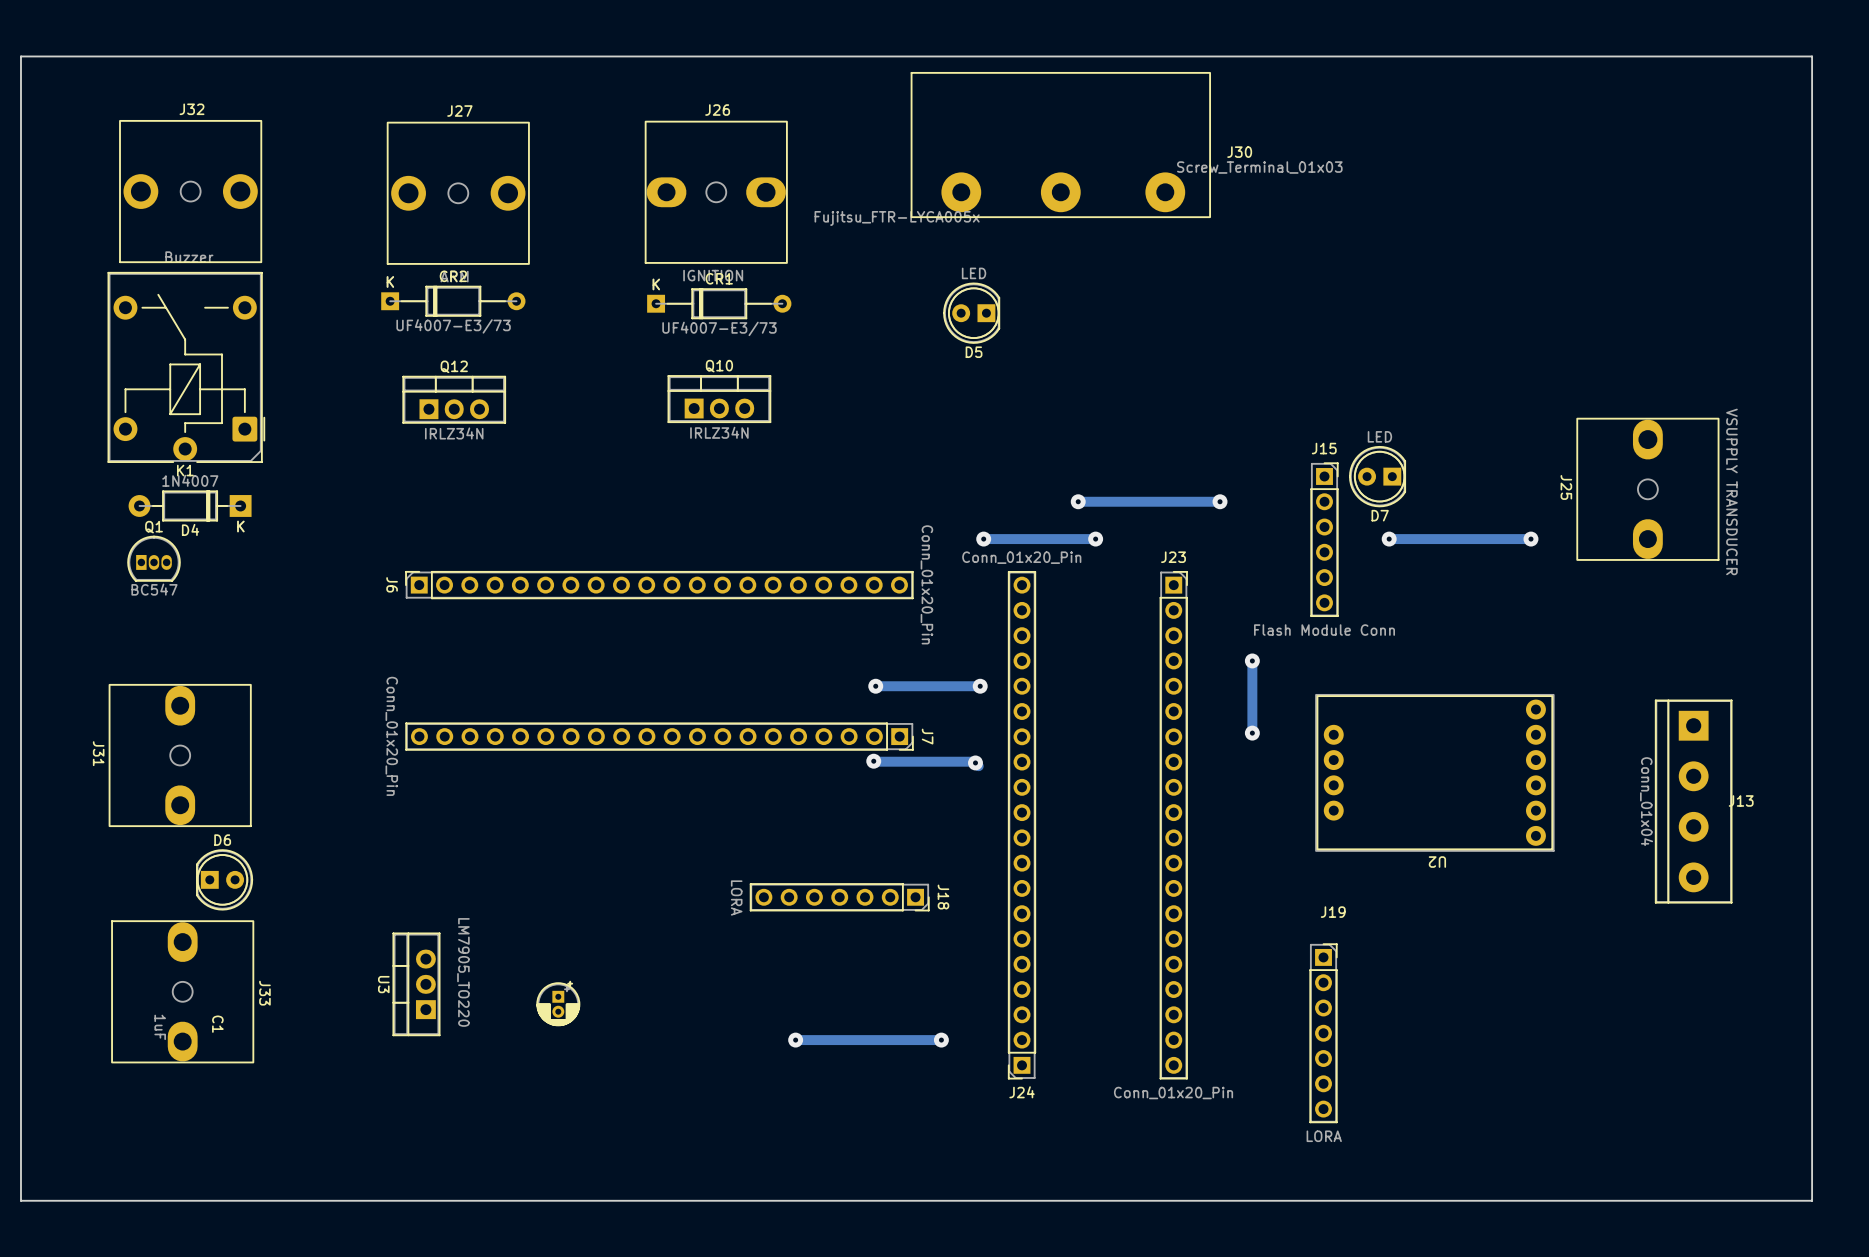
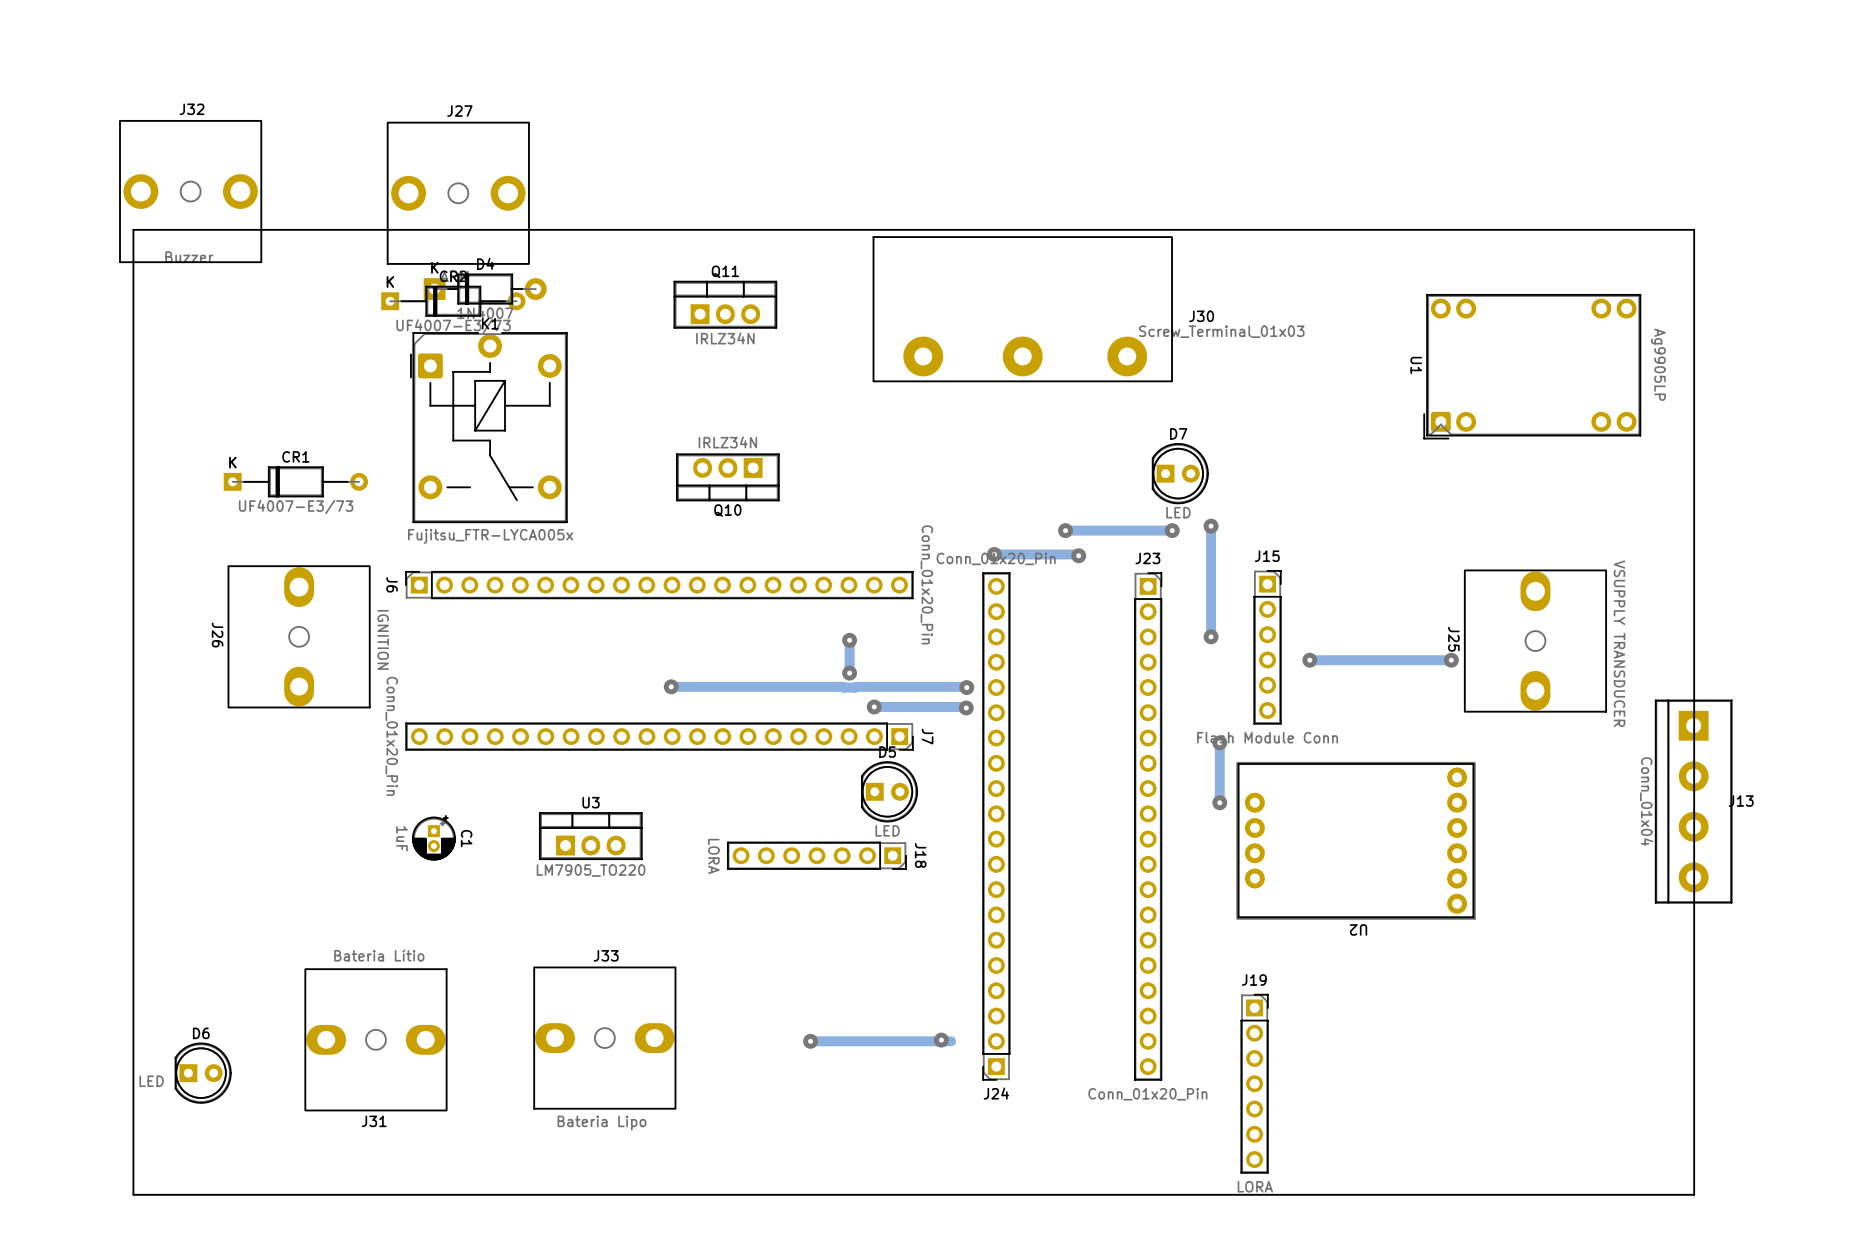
board edge: (1812, 56) (20, 56) (20, 1200) (1812, 1200) (1812, 56) -> (1694, 229) (1694, 1194) (133, 1194) (133, 229) (1694, 229)
J30 position: (1060, 145) -> (1022, 309)
J26 rotation: 0° (716, 192) -> 90° counterclockwise (299, 636)
J26 position: (716, 192) -> (299, 636)
K1 value position: Fujitsu_FTR-LYCA005x (897, 218) -> Fujitsu_FTR-LYCA005x (490, 536)
CR1 position: (719, 303) -> (295, 481)
Q11: none -> IRLZ34N (725, 304)
D5 rotation: 0° (971, 313) -> 180° (889, 791)
D5 position: (971, 313) -> (889, 791)
U1: none -> Ag9905LP (1532, 366)
K1 rotation: 0° (186, 367) -> 180° (488, 427)
K1 position: (186, 367) -> (488, 427)
Q12: IRLZ34N (454, 399) -> none
Q10 rotation: 0° (719, 399) -> 180° (727, 477)
Q10 position: (719, 399) -> (727, 477)
D7 rotation: 0° (1377, 476) -> 180° (1180, 473)
D7 position: (1377, 476) -> (1180, 473)
J25 position: (1647, 489) -> (1535, 641)
via: (1078, 501) -> none
track: (1220, 501) (1078, 501) -> none
via position: (1220, 501) -> (1211, 526)
D4 rotation: 0° (190, 505) -> 180° (485, 289)
D4 position: (190, 505) -> (485, 289)
track: none -> (1211, 526) (1211, 636)
via: none -> (1065, 530)
track: none -> (1172, 530) (1065, 530)
via: none -> (1172, 530)
via position: (983, 539) -> (994, 554)
track: (1095, 539) (983, 539) -> none
via: (1095, 539) -> none
J15 position: (1324, 539) -> (1267, 647)
via: (1389, 539) -> none
track: (1530, 539) (1389, 539) -> none
via: (1530, 539) -> none
track: none -> (994, 554) (1078, 555)
via: none -> (1078, 555)
Q1: BC547 (154, 558) -> none
via: none -> (1211, 636)
track: none -> (849, 640) (849, 673)
via: none -> (849, 640)
track: (1252, 660) (1252, 733) -> none
via: (1252, 660) -> none
via: none -> (1309, 660)
track: none -> (1451, 660) (1309, 660)
via: none -> (1451, 660)
via: none -> (849, 673)
track: none -> (671, 686) (966, 687)
via: none -> (671, 686)
via: (875, 686) -> none
track: (980, 686) (875, 686) -> none
via: (980, 686) -> none
via: none -> (966, 687)
track: none -> (874, 706) (966, 707)
via: none -> (874, 706)
via: none -> (966, 707)
via position: (1252, 733) -> (1219, 742)
track: none -> (1219, 742) (1219, 802)
J31 name position: J31 (98, 753) -> J31 (374, 1121)
J31 rotation: 0° (180, 755) -> 90° clockwise (375, 1039)
J31 position: (180, 755) -> (375, 1039)
track: (873, 761) (974, 761) (978, 766) -> none
via: (873, 761) -> none
via: (975, 762) -> none
U2 position: (1434, 772) -> (1356, 840)
via: none -> (1219, 802)
J24 position: (1022, 825) -> (996, 826)
J23 position: (1173, 825) -> (1148, 826)
D6 position: (224, 879) -> (203, 1073)
J18 position: (839, 897) -> (816, 855)
J19 name position: J19 (1333, 912) -> J19 (1254, 980)
J31 value: none -> Bateria Lítio (379, 955)
U3 rotation: 0° (416, 984) -> 90° clockwise (590, 836)
U3 position: (416, 984) -> (590, 836)
J33 rotation: 0° (182, 991) -> 90° clockwise (604, 1038)
J33 position: (182, 991) -> (604, 1038)
J33 name position: J33 (264, 993) -> J33 (606, 955)
C1 position: (558, 1003) -> (433, 837)
C1 name position: C1 (217, 1024) -> C1 (466, 838)
C1 value position: 1uF (160, 1027) -> 1uF (401, 838)
J19 position: (1323, 1033) -> (1254, 1083)
track: (794, 1039) (941, 1040) -> none
via position: (795, 1040) -> (810, 1041)
track: none -> (951, 1041) (810, 1041)
D6 value: none -> LED (151, 1081)
J33 value: none -> Bateria Lipo (601, 1123)

